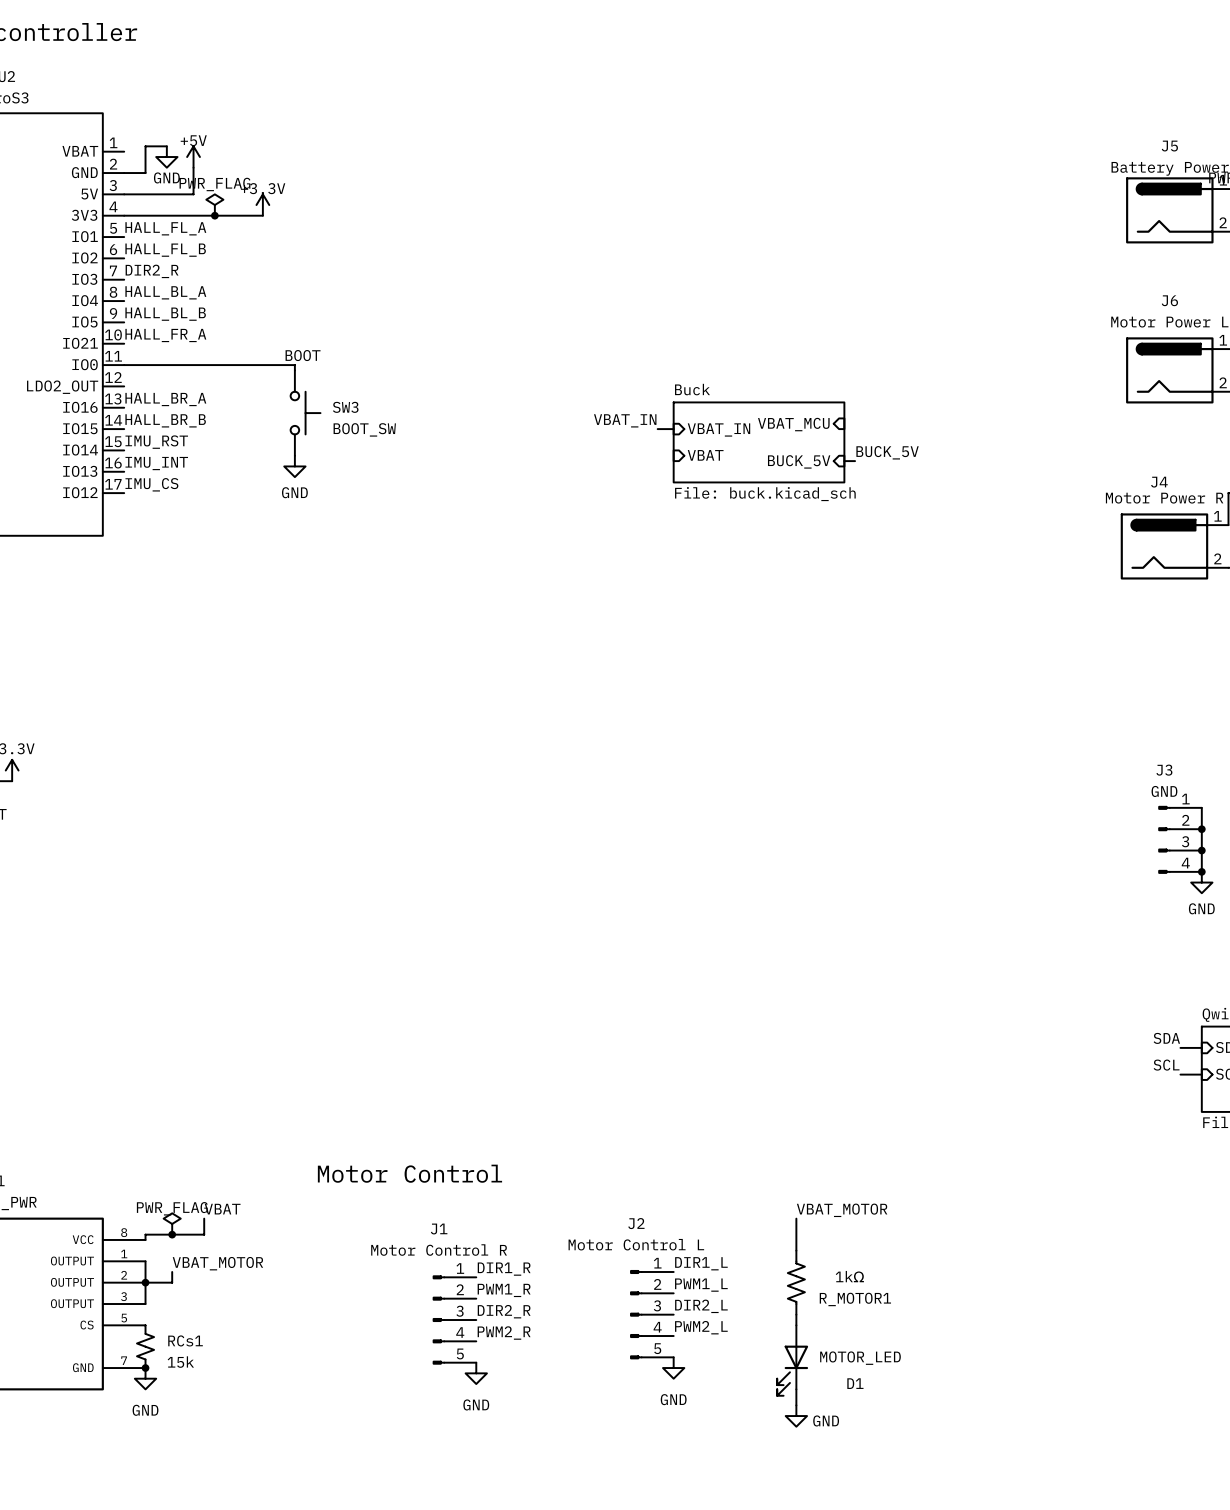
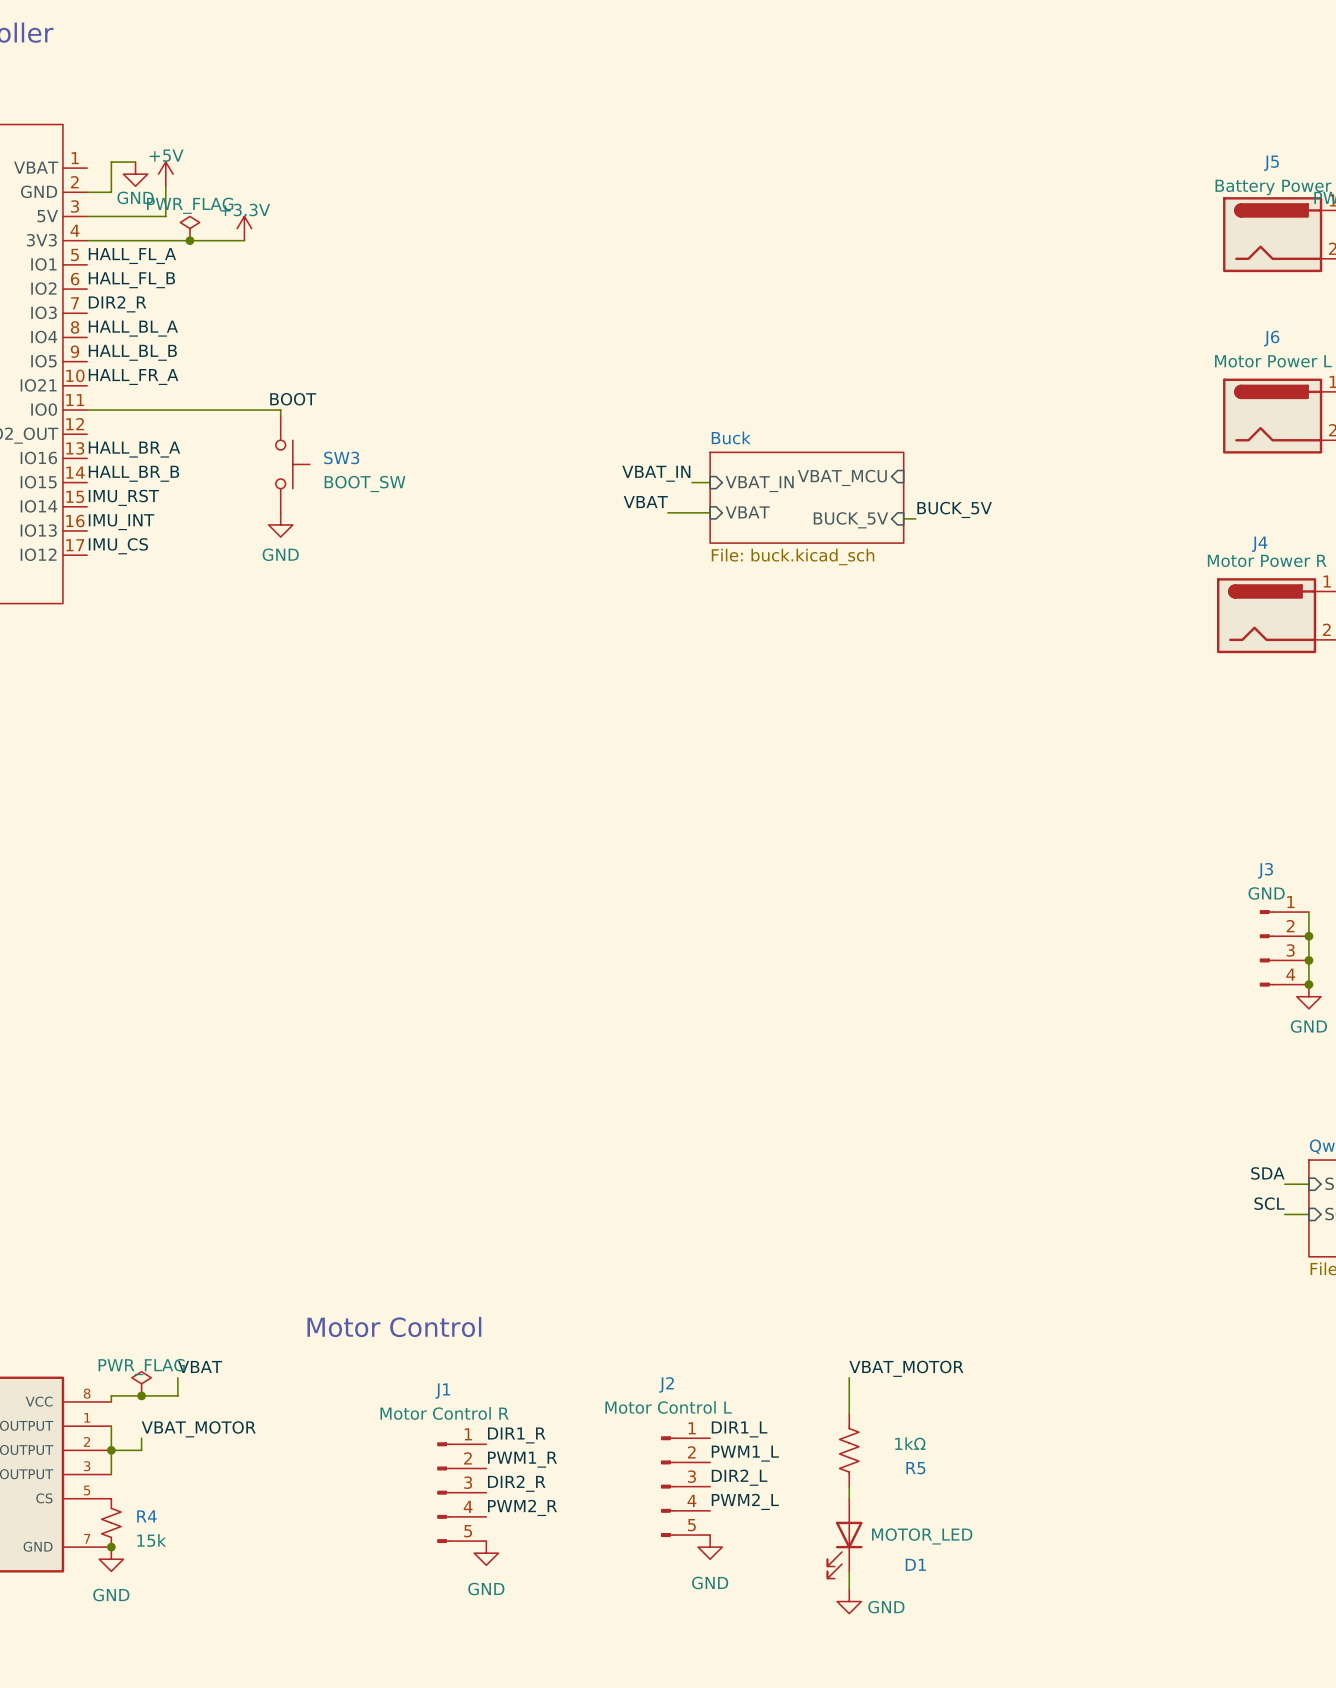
label: none -> VBAT (645, 502)
wire: none -> (667, 512) (710, 512)
R_MOTOR1 name: R_MOTOR1 (855, 1299) -> R5 (915, 1468)
RCs1 name: RCs1 (185, 1340) -> R4 (146, 1516)

